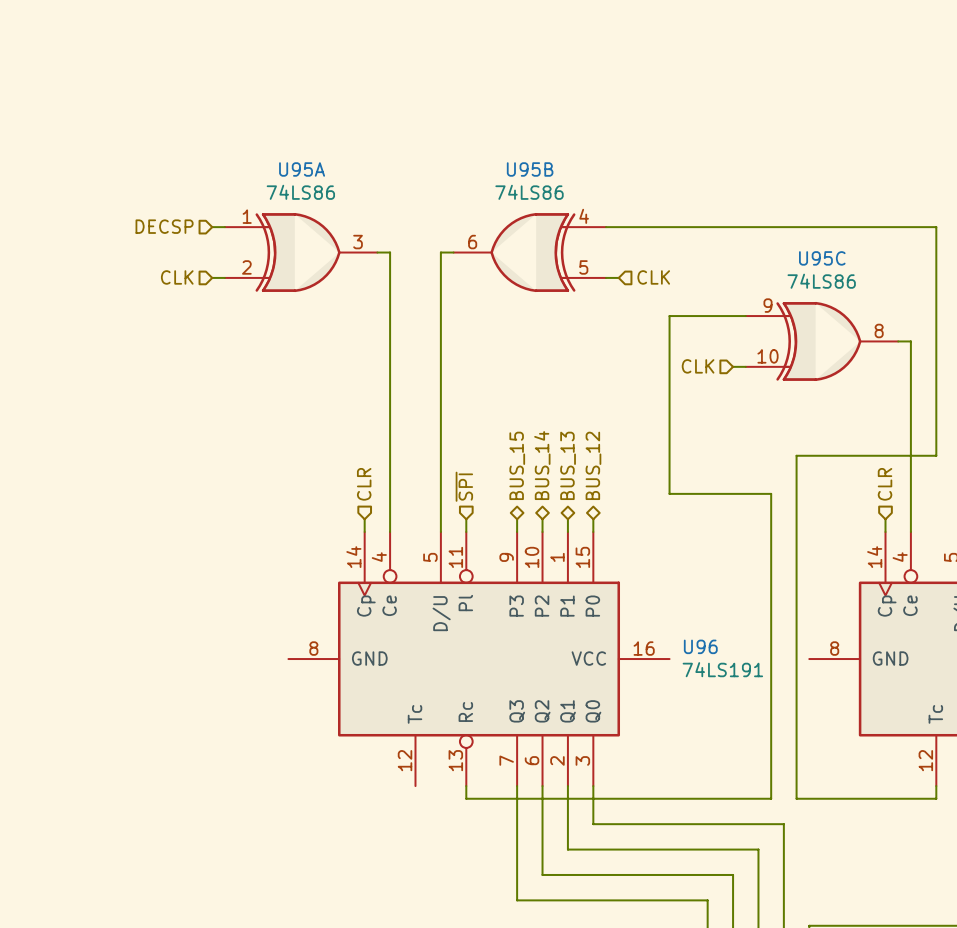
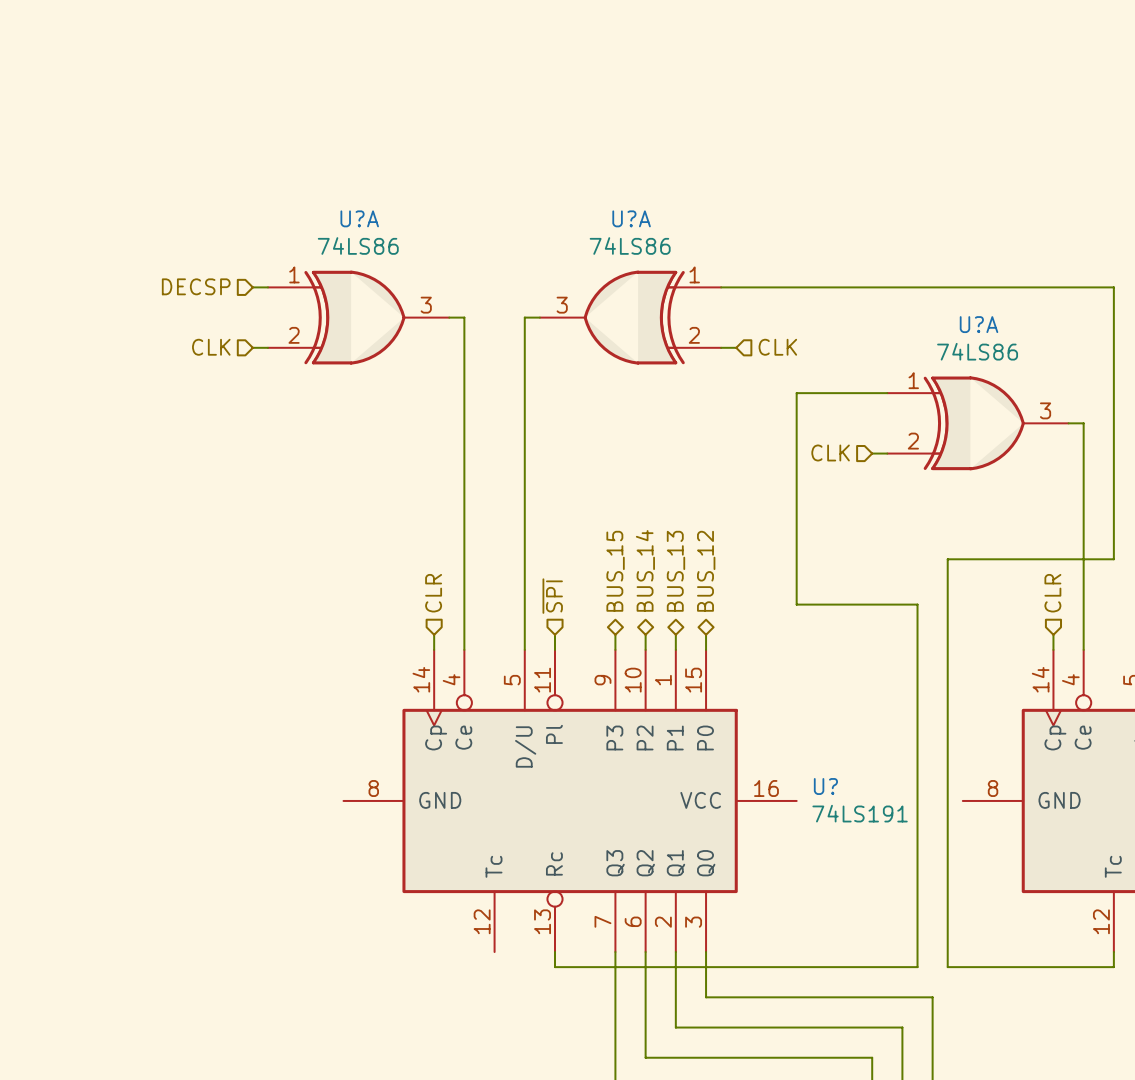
U95A name: U95A (302, 169) -> U?A (359, 218)
U95B name: U95B (530, 169) -> U?A (631, 218)
U95B pin number: 4 (584, 216) -> 1 (694, 274)
U95B pin number: 6 (472, 242) -> 3 (562, 305)
U95C name: U95C (822, 258) -> U?A (979, 324)
U95B pin number: 5 (583, 267) -> 2 (694, 335)
U95C pin number: 9 (768, 305) -> 1 (913, 380)
U95C pin number: 8 (879, 330) -> 3 (1045, 410)
U95C pin number: 10 (768, 356) -> 2 (913, 441)
U96 name: U96 (700, 646) -> U? (825, 786)

